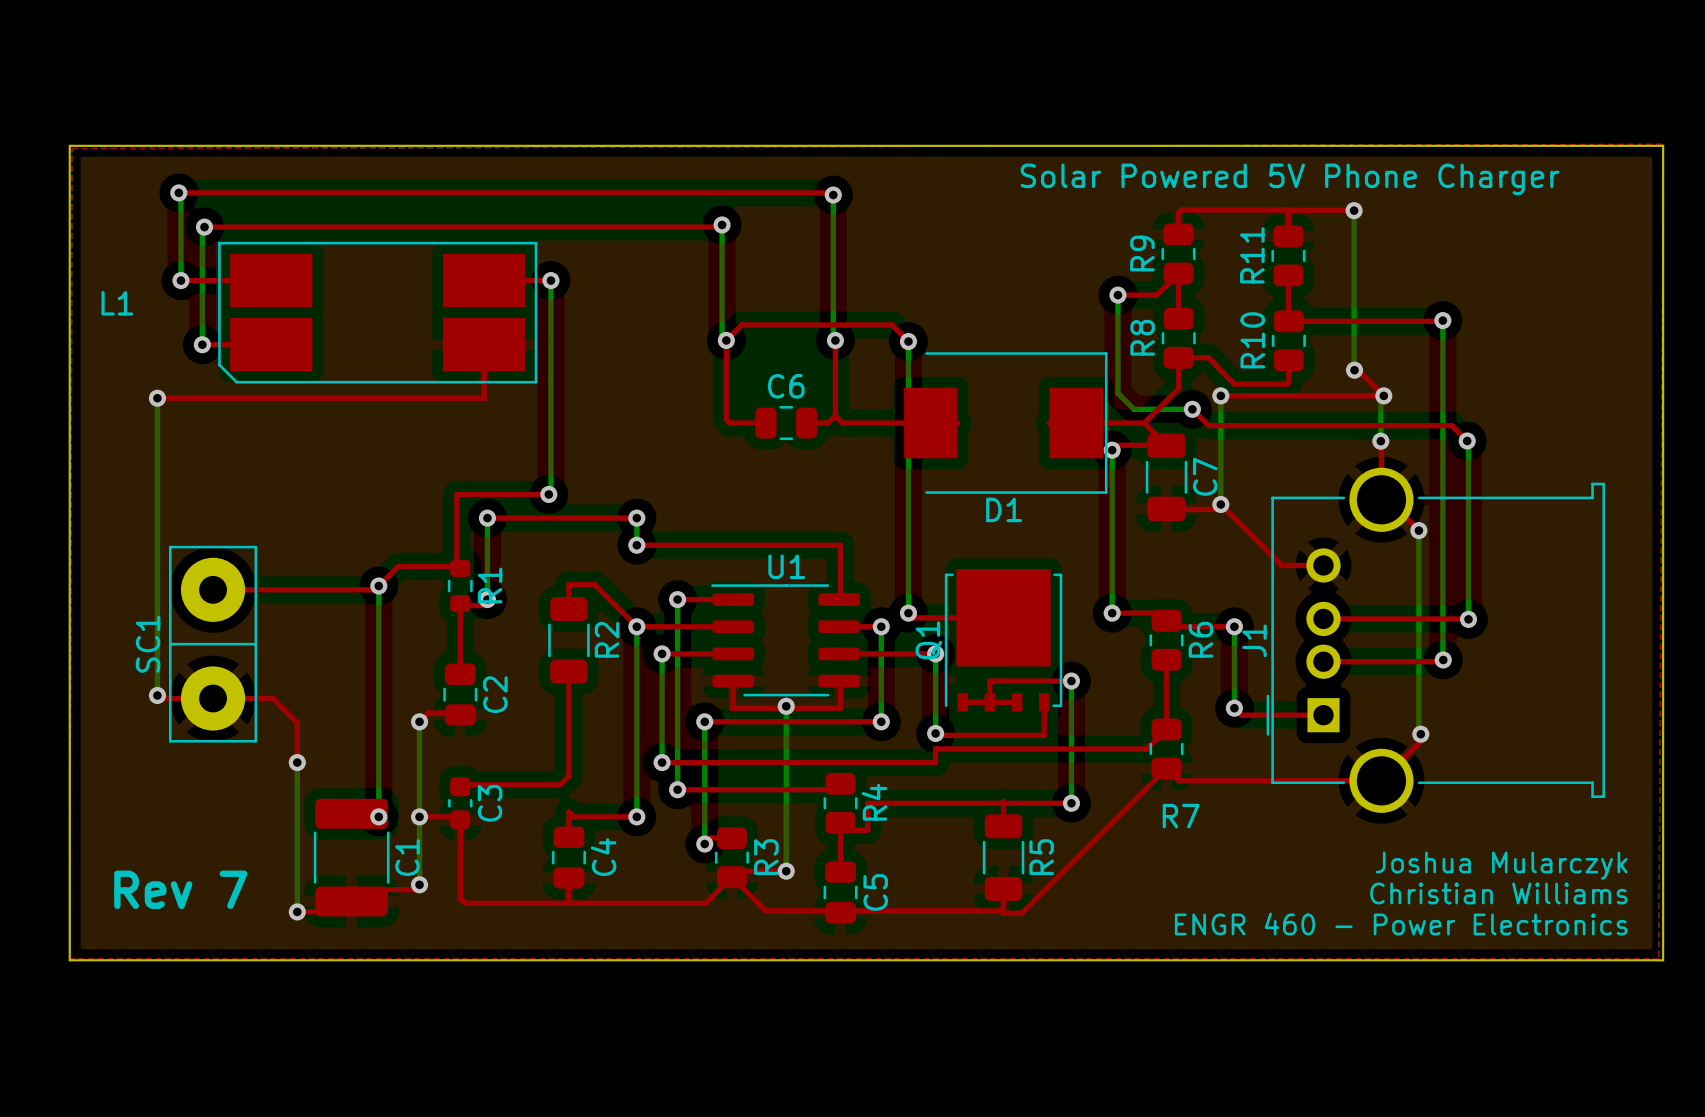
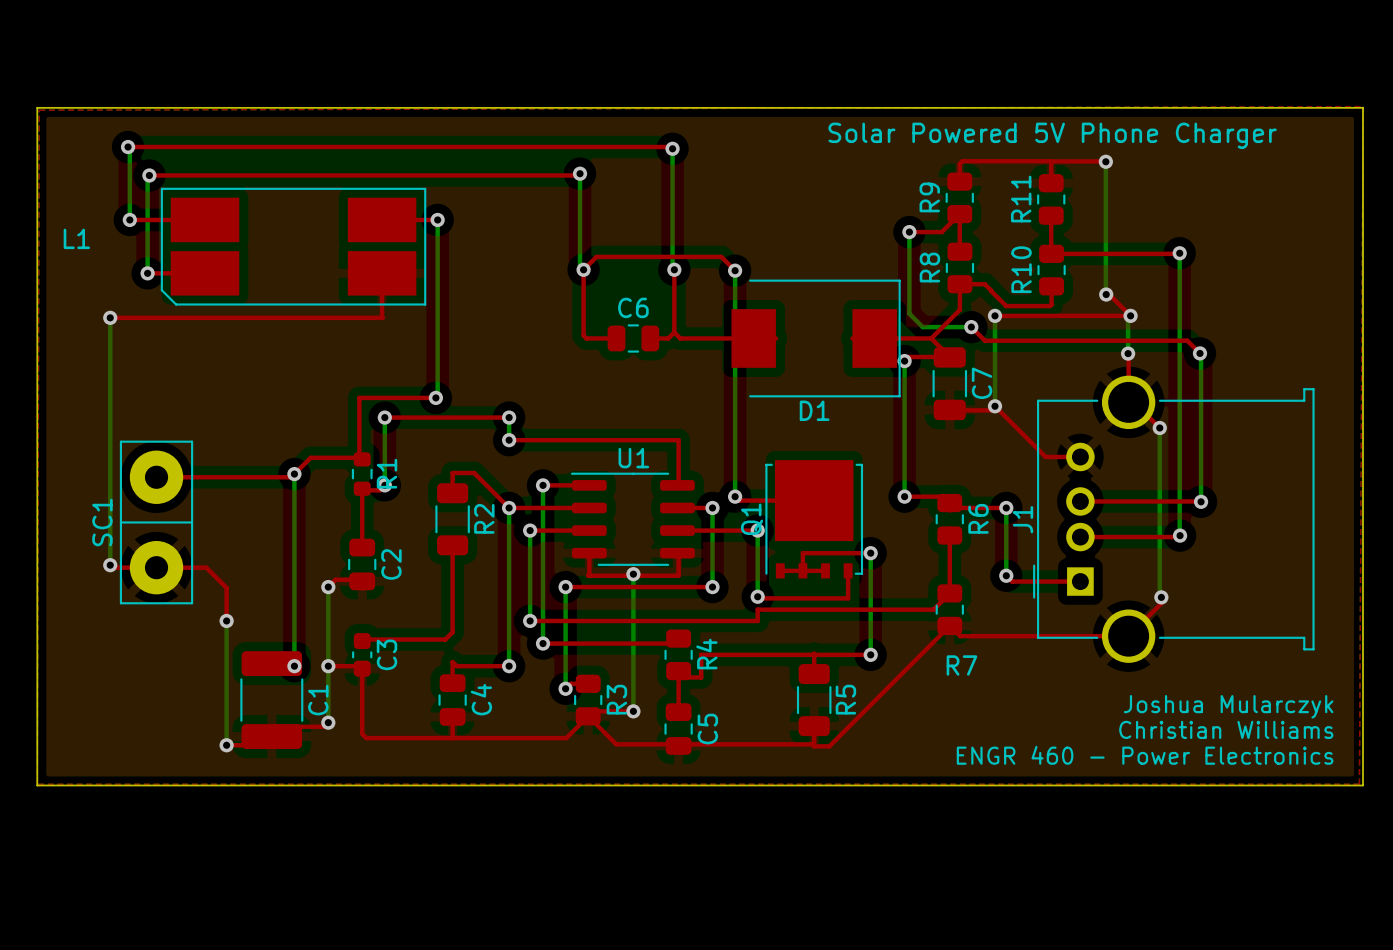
text: Rev 7 (180, 889) -> none

